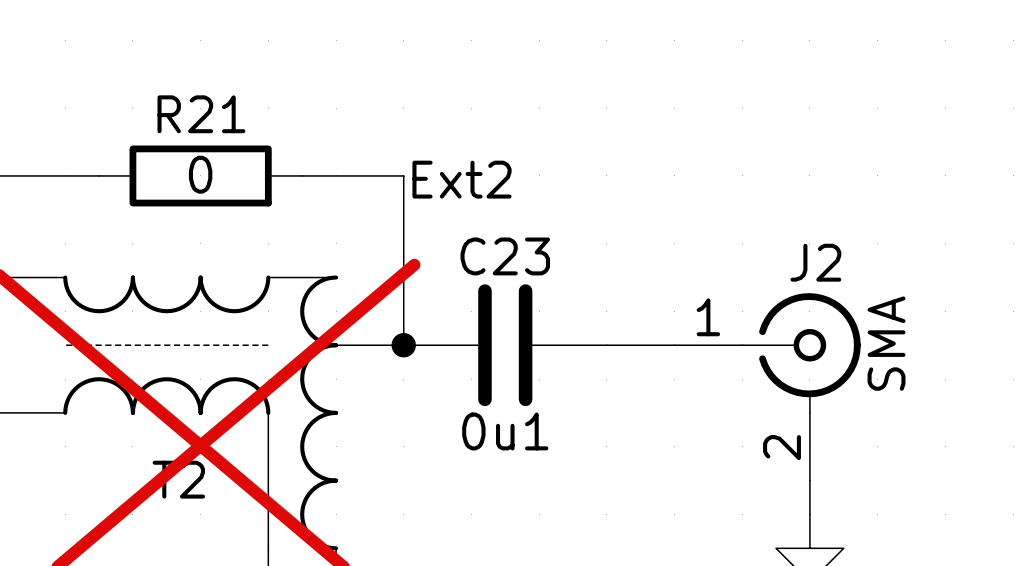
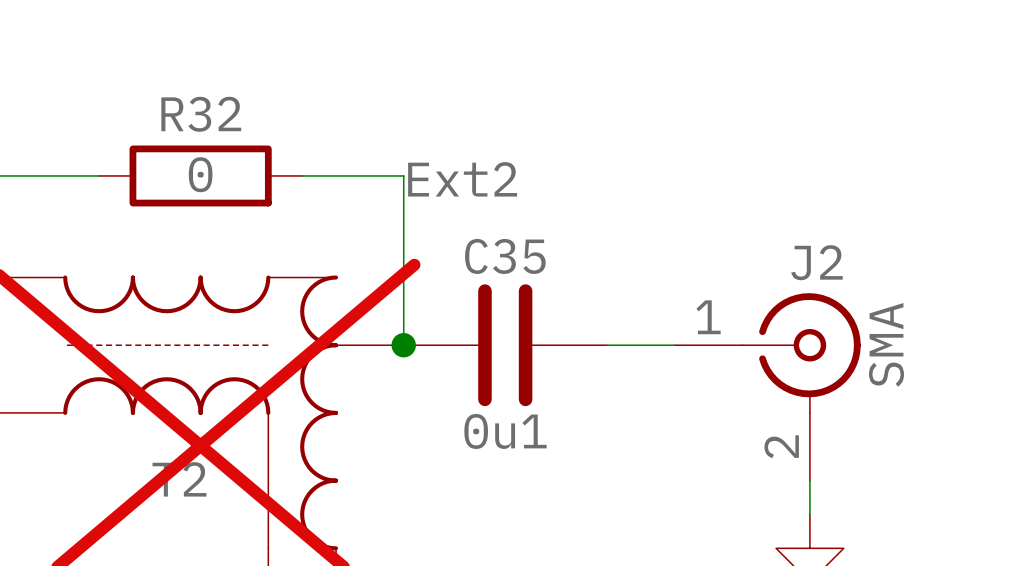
R21 name: R21 (201, 114) -> R32 (201, 114)
C23 name: C23 (505, 256) -> C35 (505, 256)

